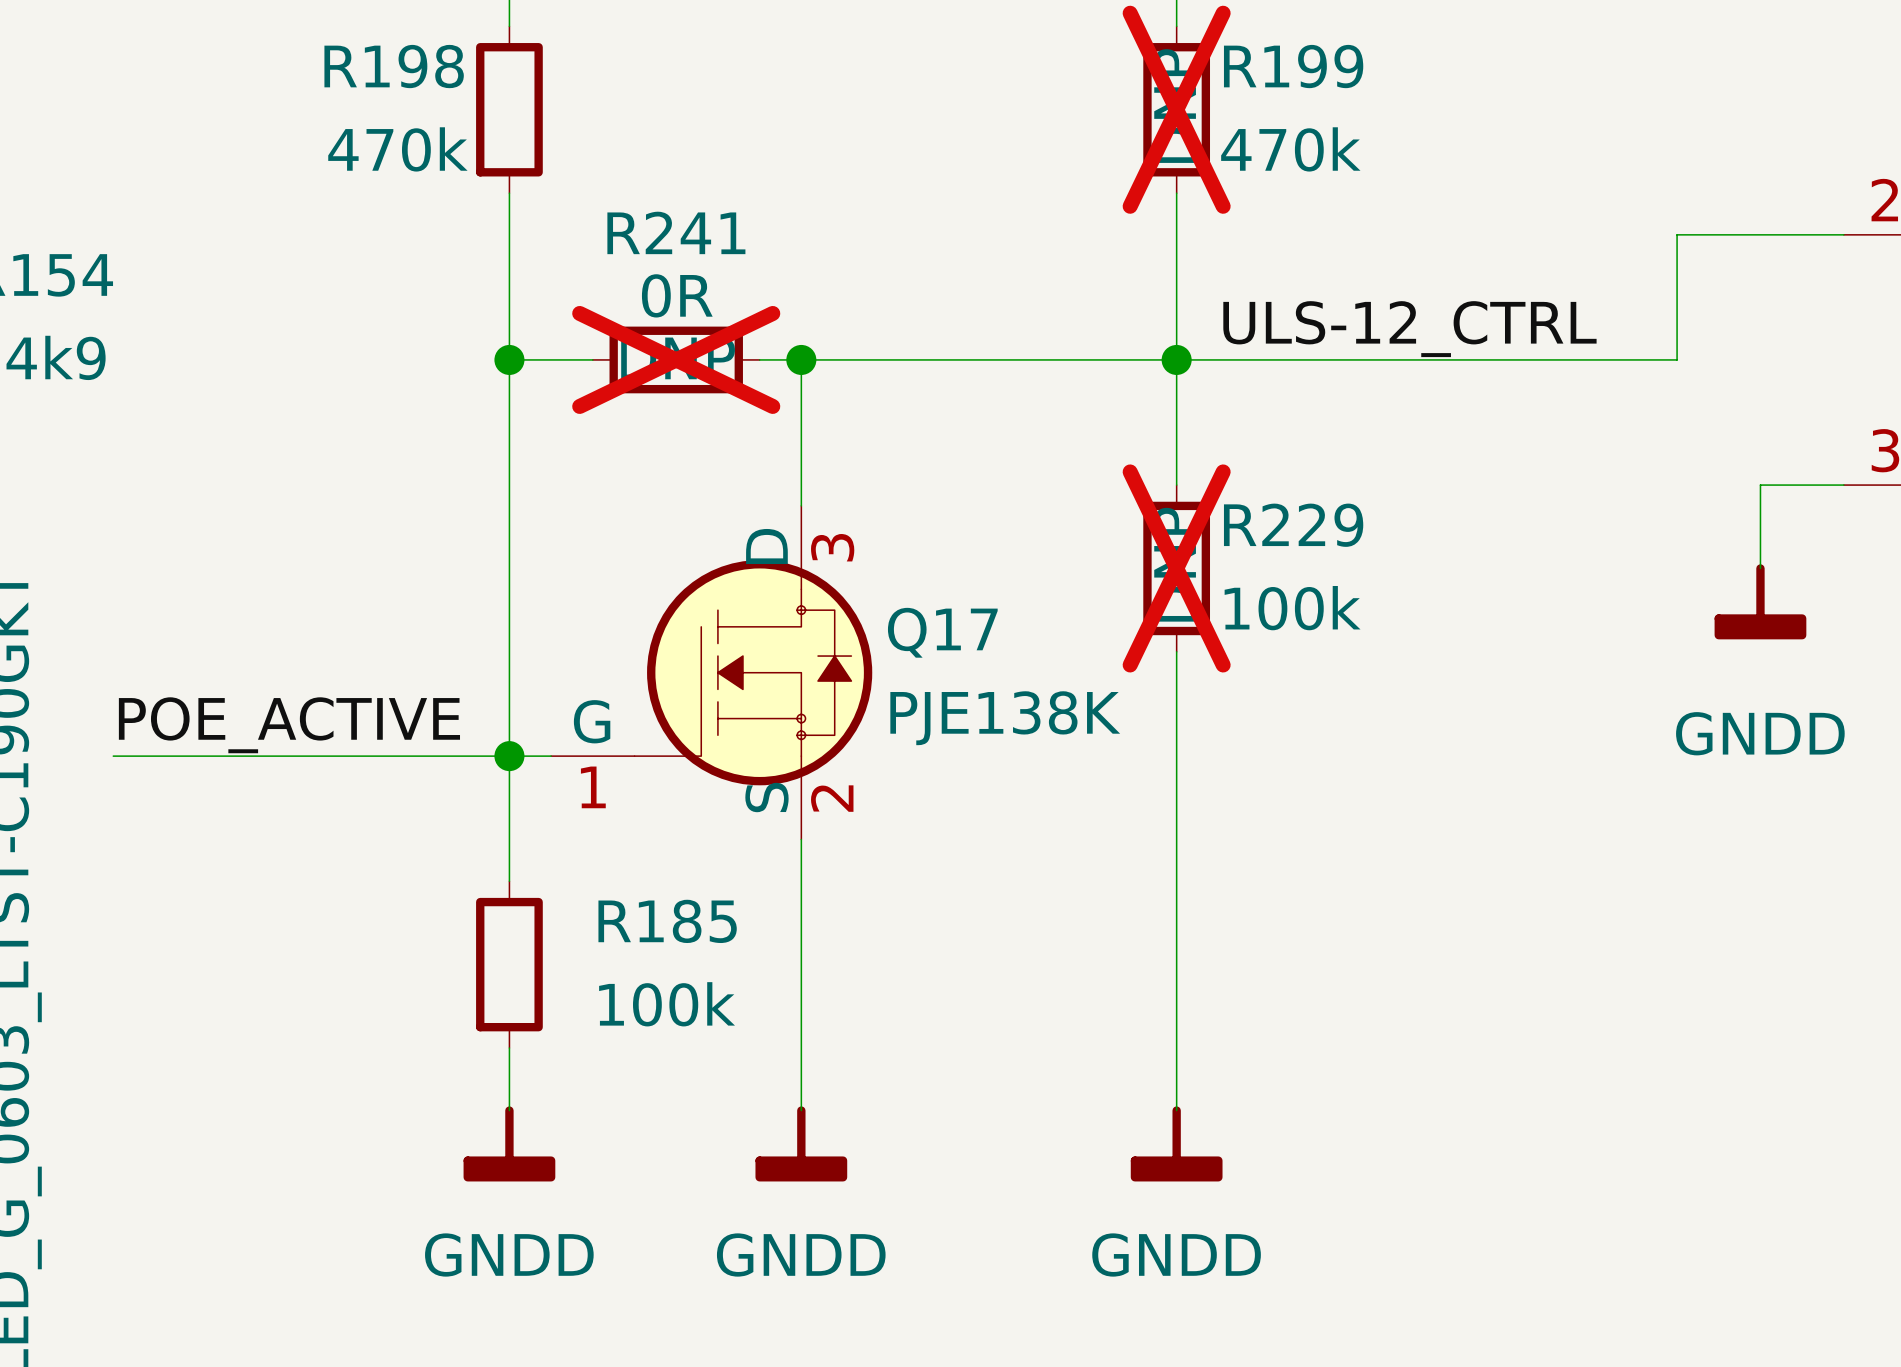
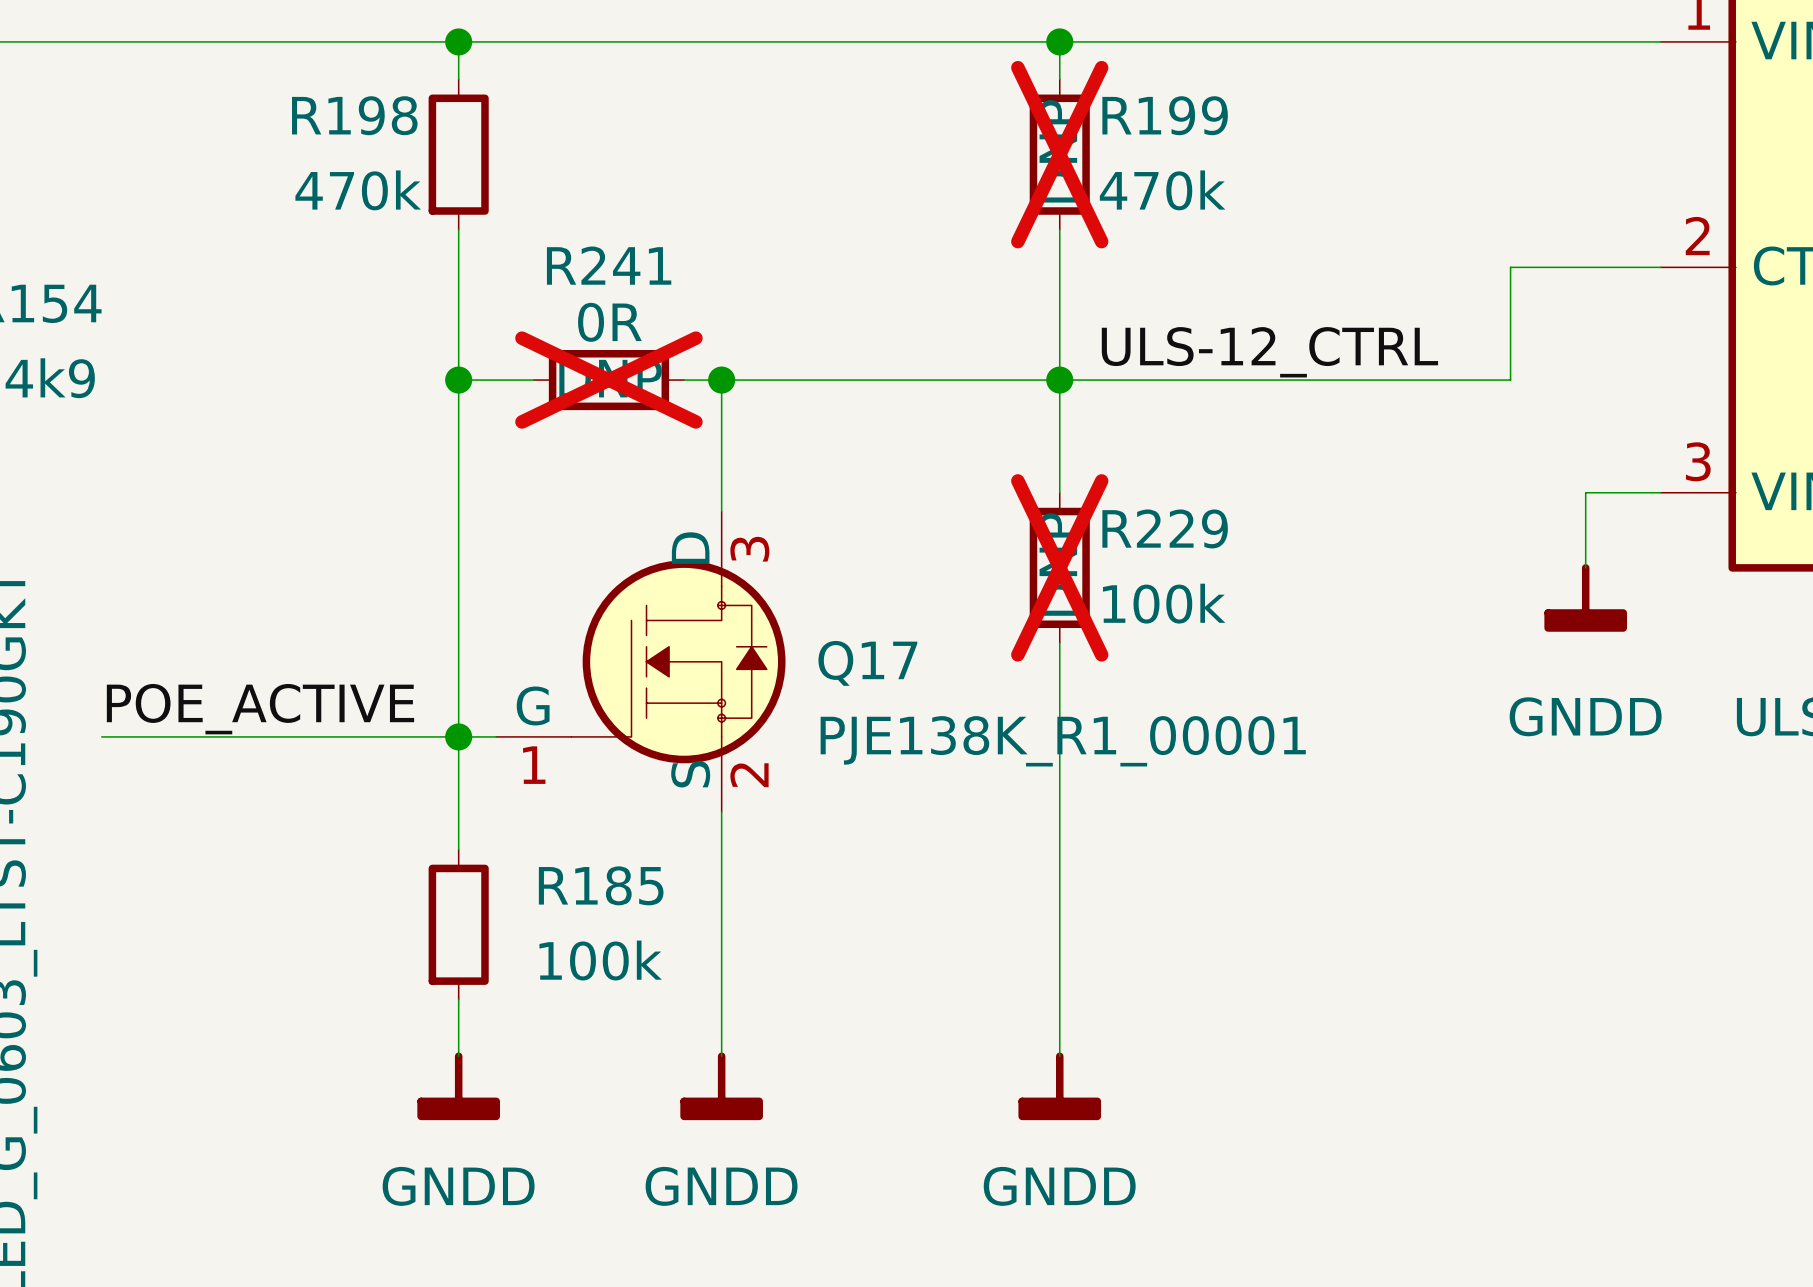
Q17 name position: Q17 (942, 632) -> Q17 (867, 663)
Q17 value: PJE138K (1005, 718) -> none
Q17 text: none -> PJE138K_R1_00001 (1063, 741)

